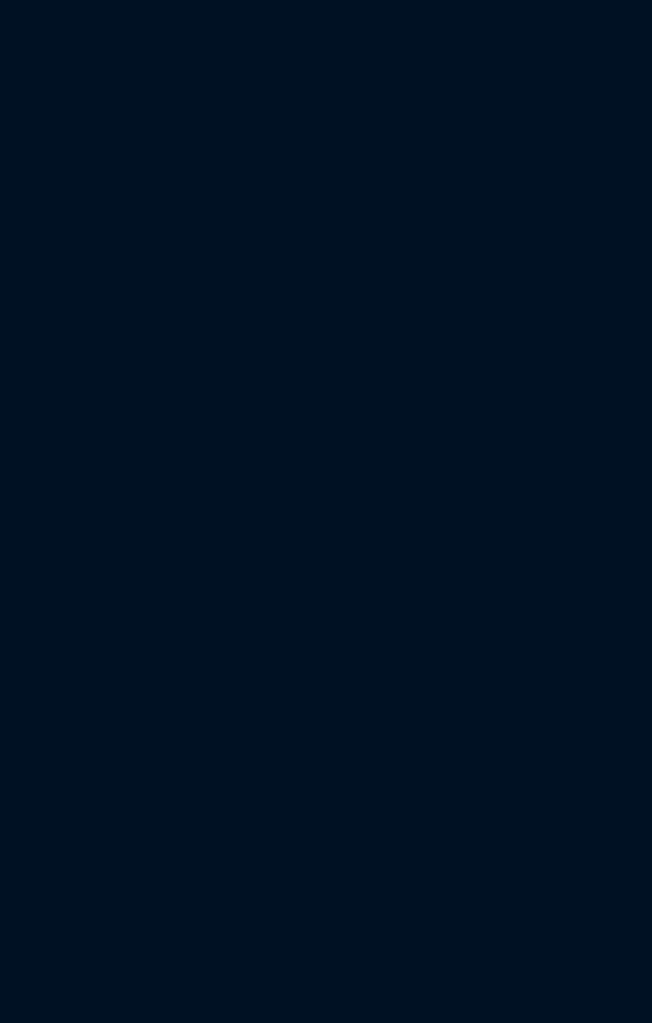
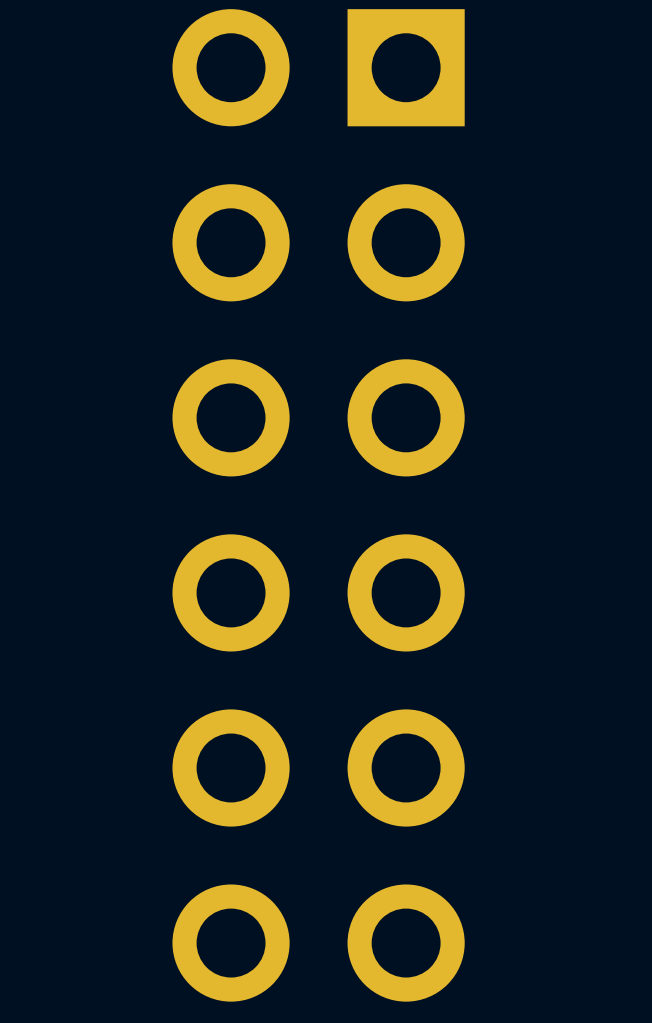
part: none -> (318, 505)

